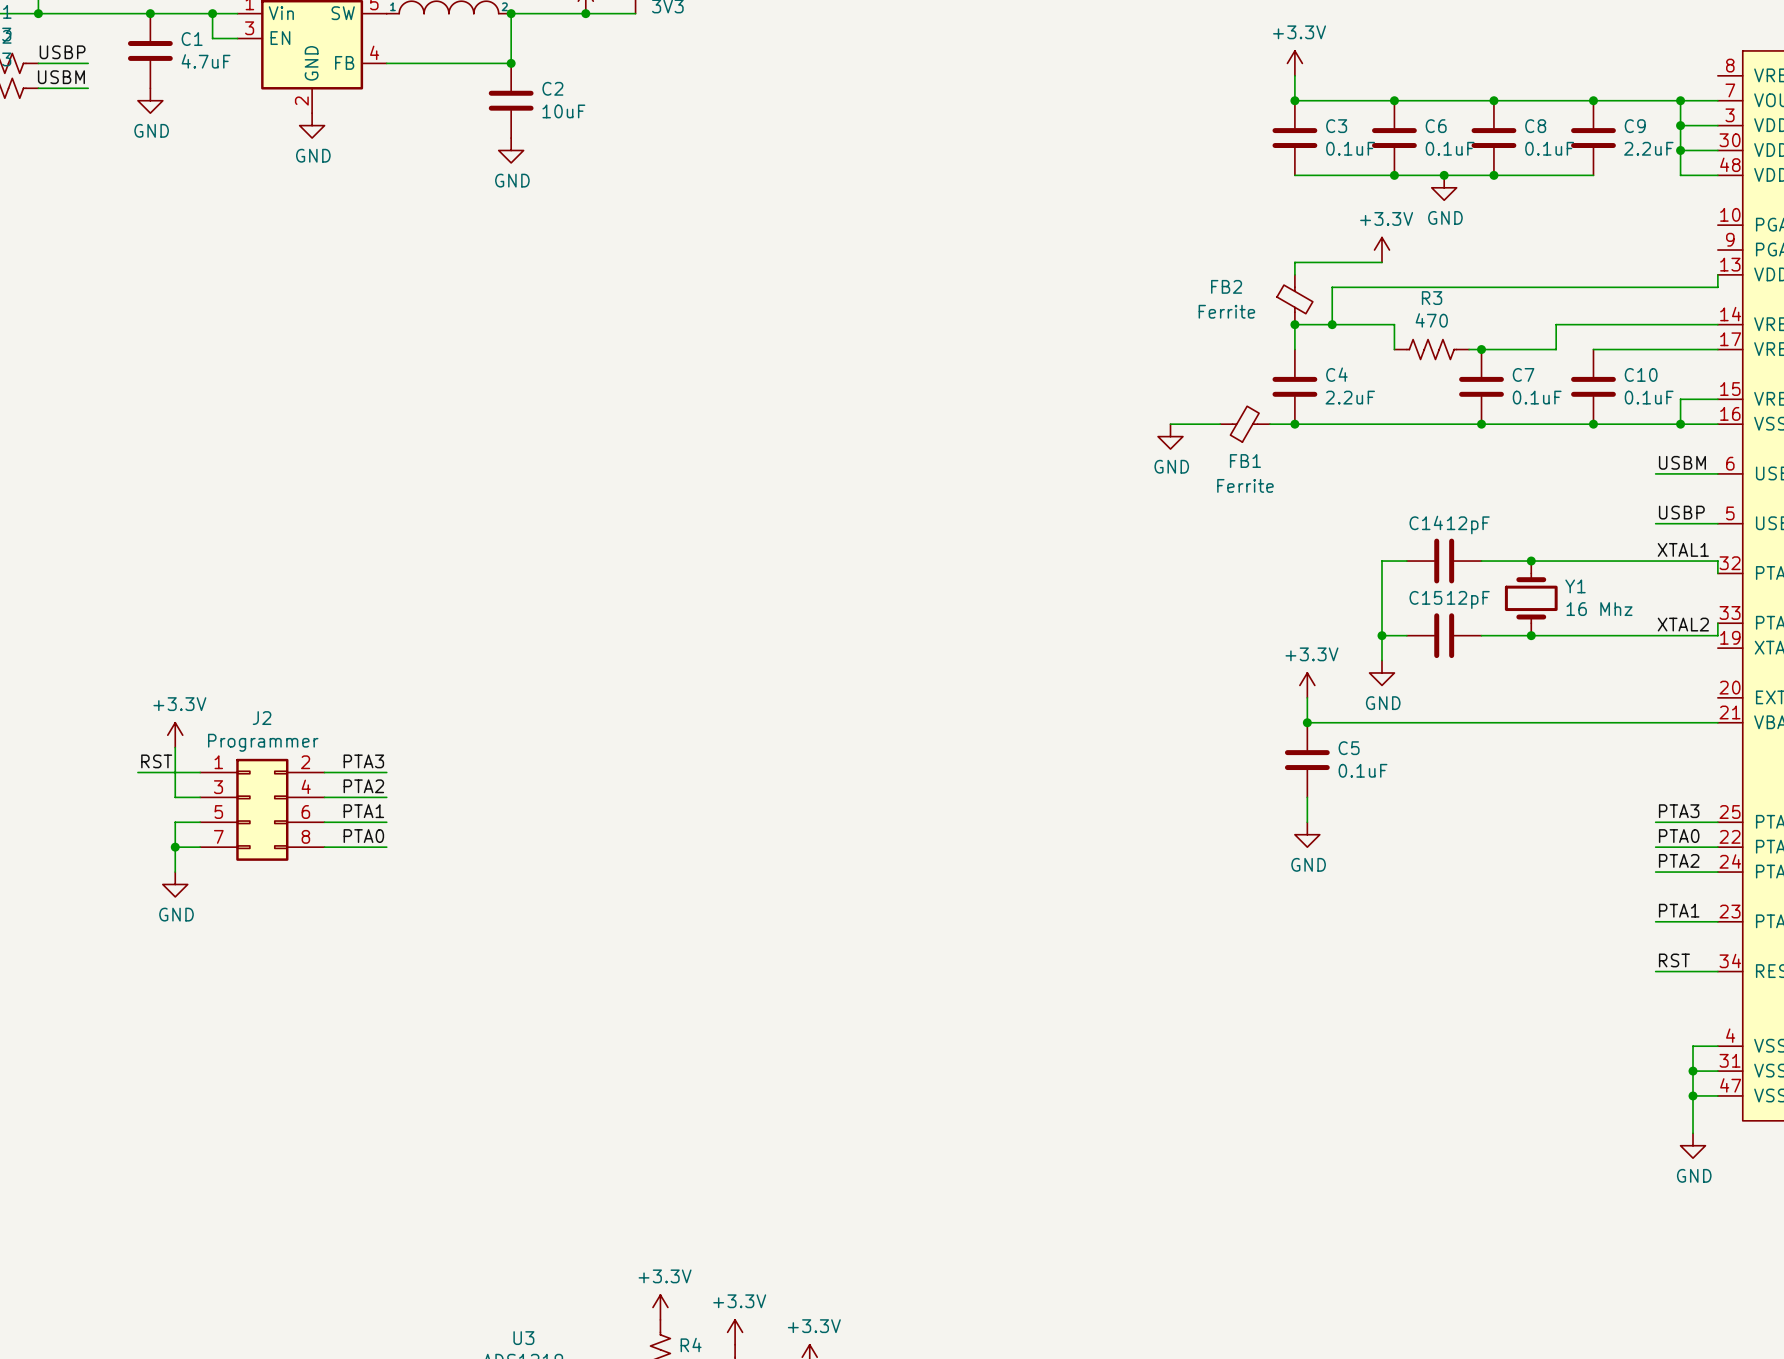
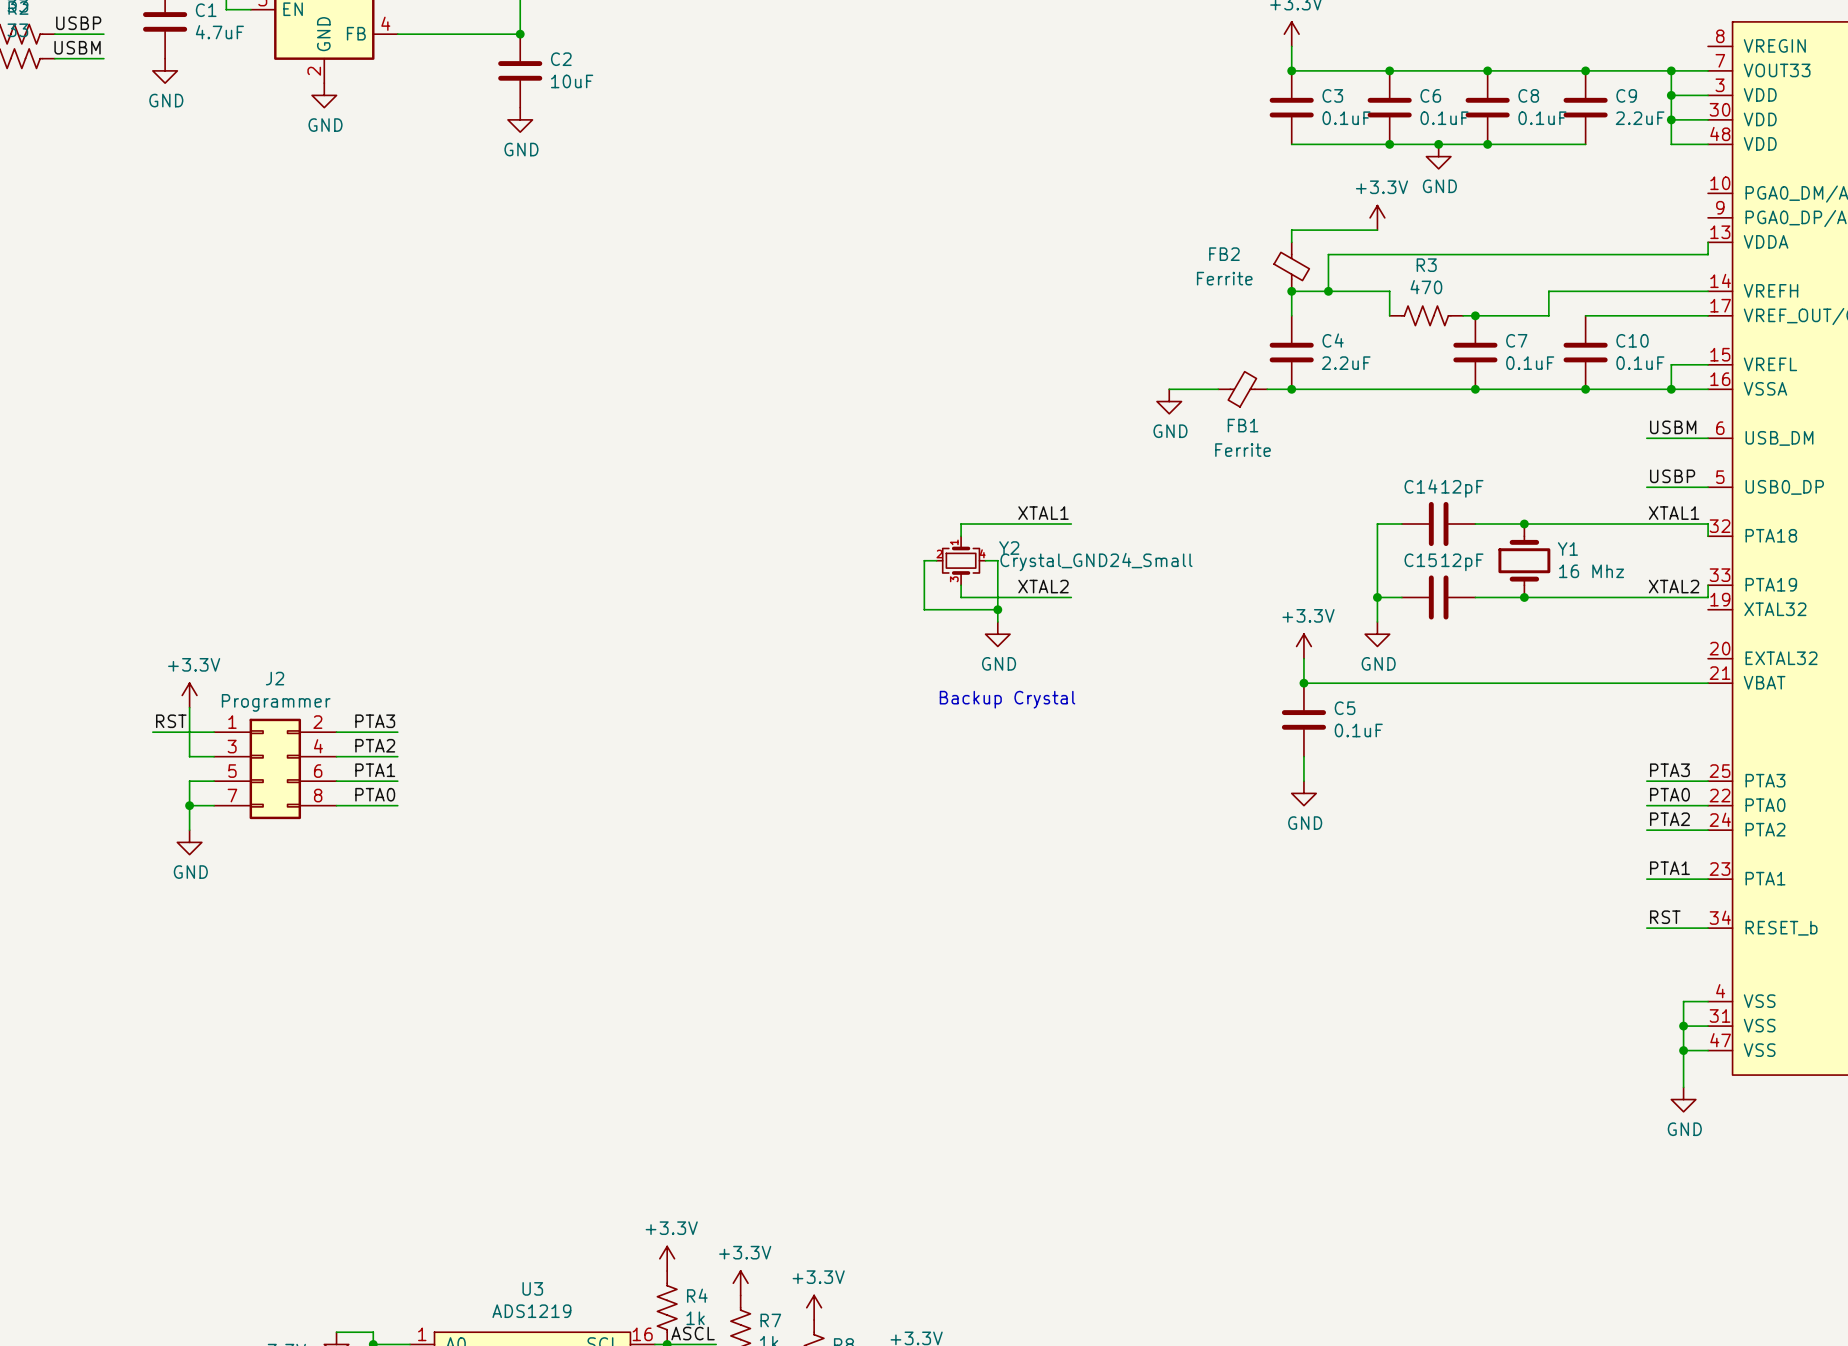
label: none -> XTAL1 (1043, 513)
wire: none -> (1071, 524) (961, 524) (961, 536)
wire: none -> (936, 560) (924, 560) (924, 609) (997, 609)
Y2: none -> Crystal_GND24_Small (961, 560)
wire: none -> (985, 560) (997, 560) (997, 621)
wire: none -> (961, 585) (961, 597) (1071, 597)
label: none -> XTAL2 (1043, 586)
junction: none -> (997, 609)
power symbol: none -> GND (997, 634)
text: none -> Backup Crystal (1007, 699)

